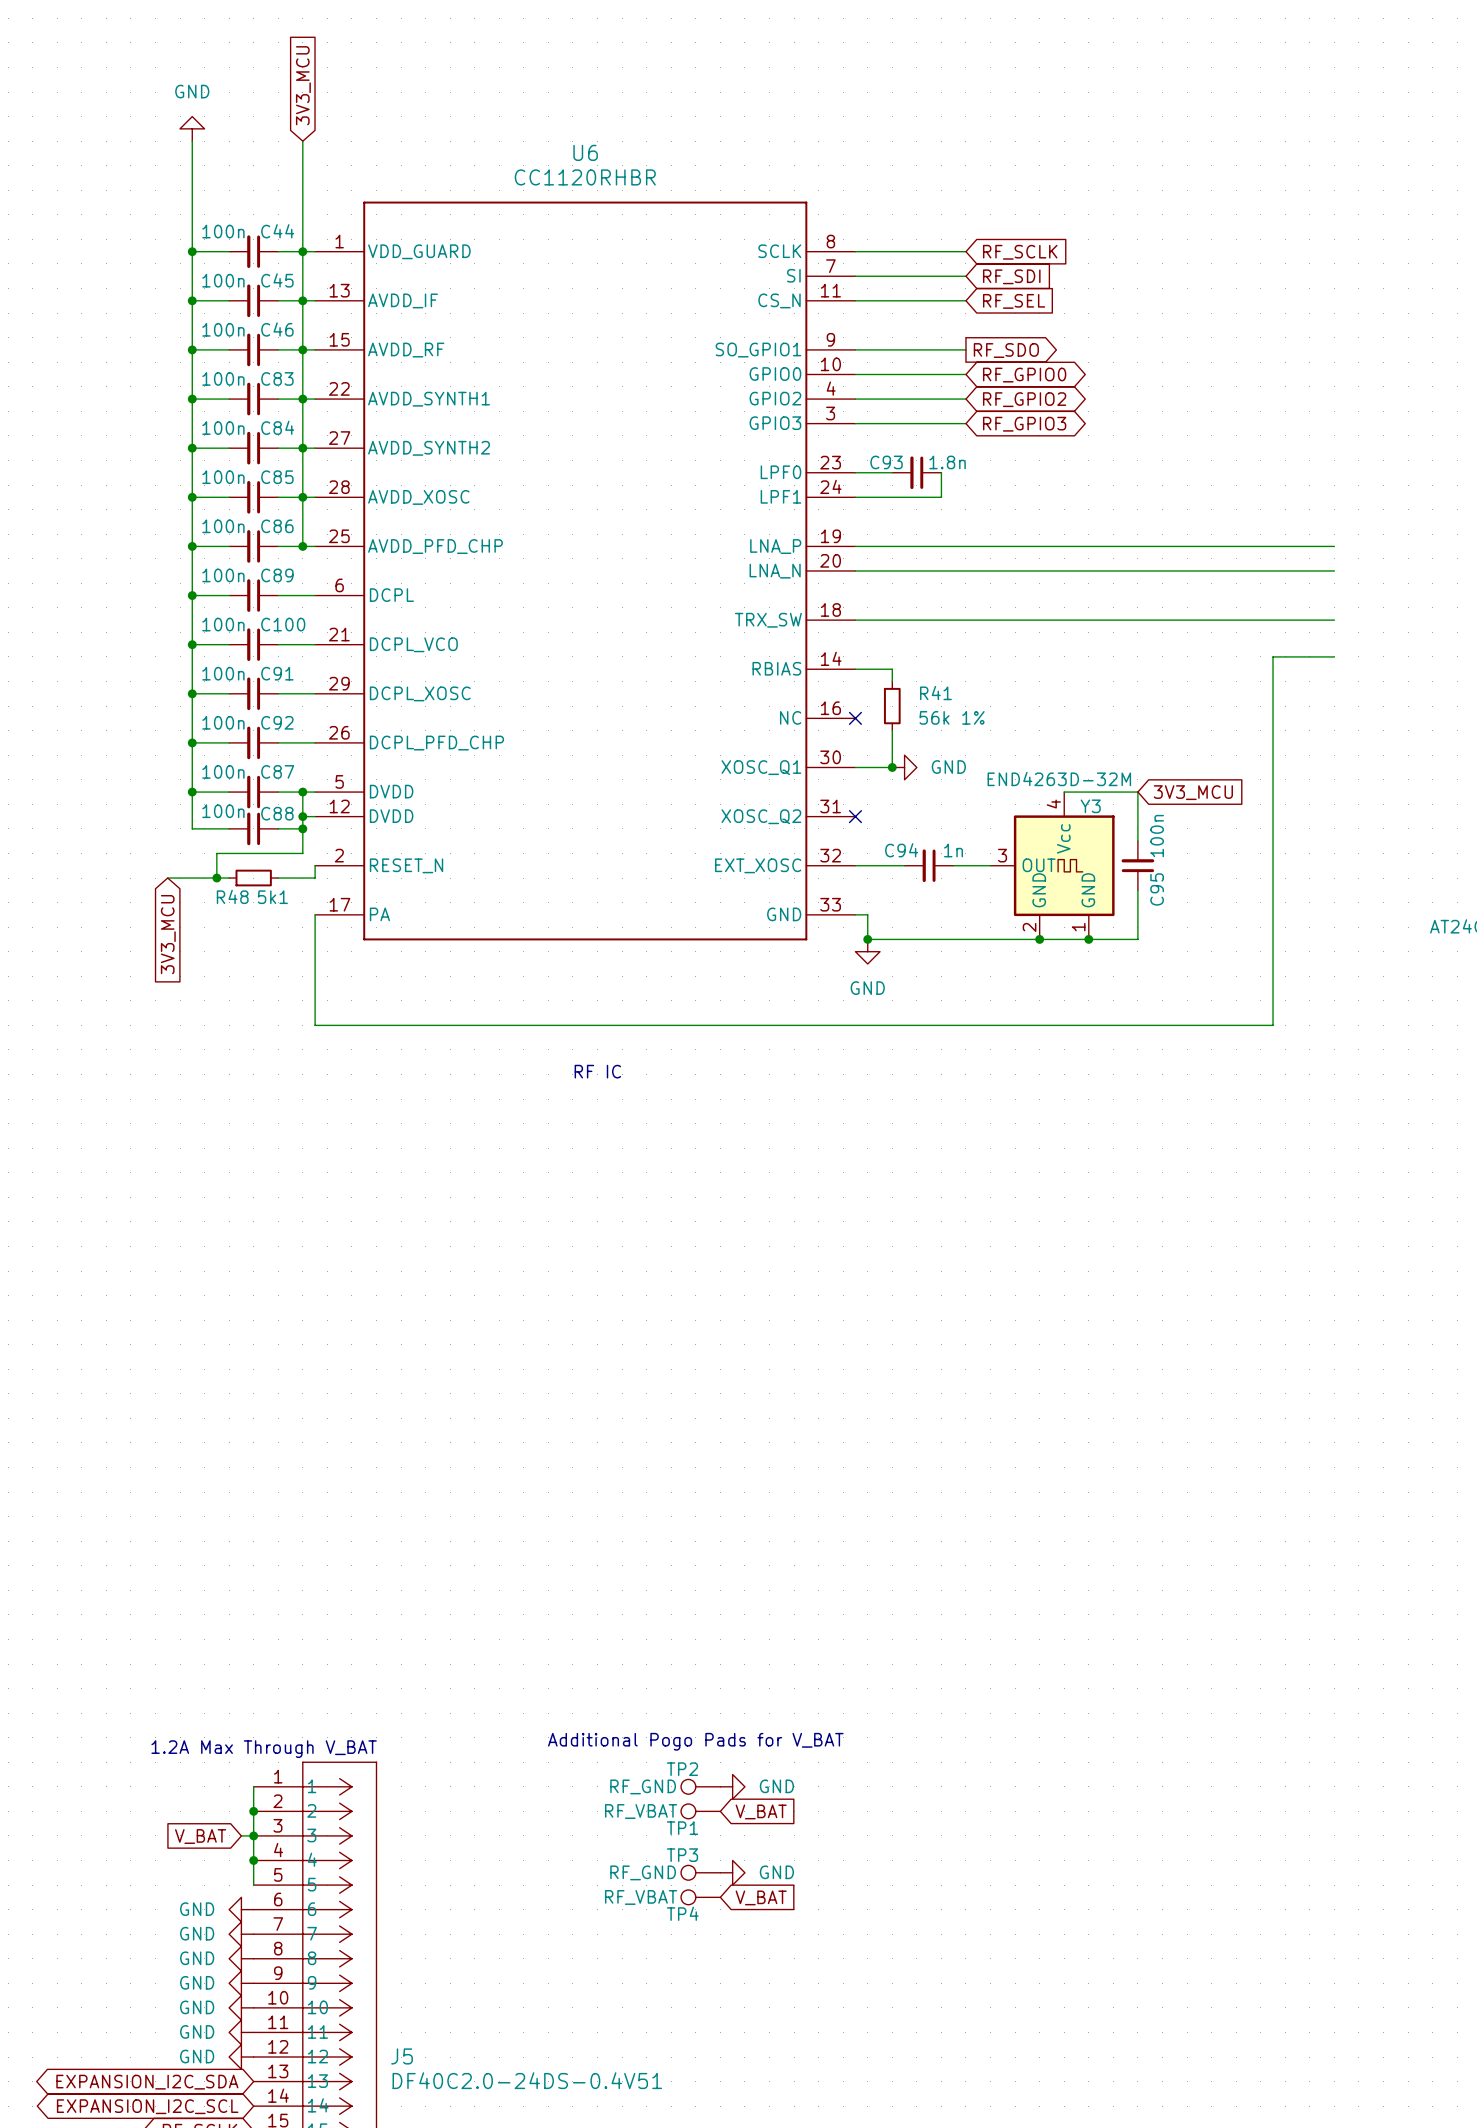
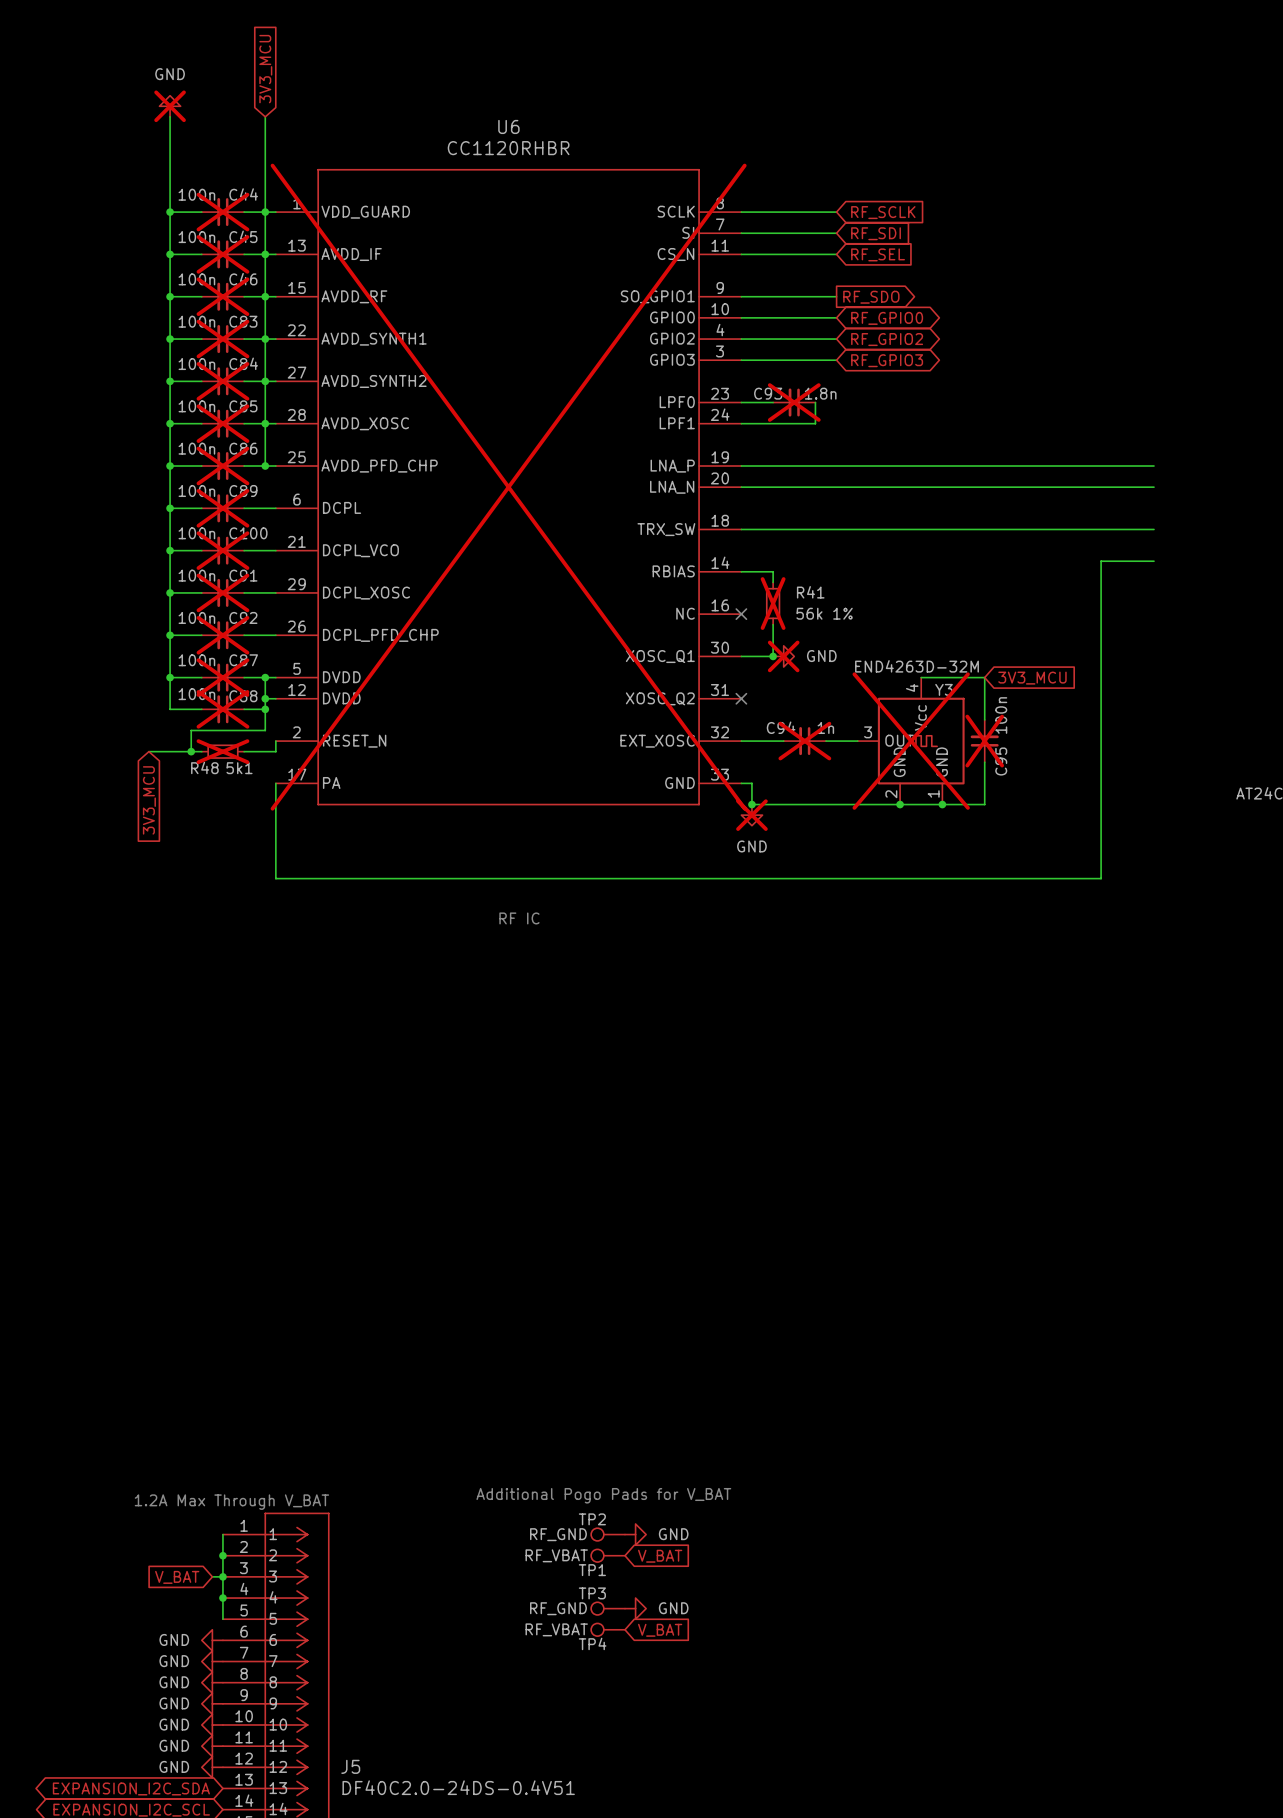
power symbol do-not-place cross: none -> (170, 106)
C44 do-not-place cross: none -> (222, 212)
C45 do-not-place cross: none -> (222, 254)
C46 do-not-place cross: none -> (222, 296)
C83 do-not-place cross: none -> (222, 339)
C84 do-not-place cross: none -> (222, 381)
C93 do-not-place cross: none -> (794, 402)
C85 do-not-place cross: none -> (222, 423)
C86 do-not-place cross: none -> (222, 466)
U6 do-not-place cross: none -> (508, 487)
C89 do-not-place cross: none -> (222, 508)
C100 do-not-place cross: none -> (222, 550)
C91 do-not-place cross: none -> (222, 592)
R41 do-not-place cross: none -> (773, 603)
C92 do-not-place cross: none -> (222, 635)
power symbol do-not-place cross: none -> (783, 656)
C87 do-not-place cross: none -> (222, 677)
C88 do-not-place cross: none -> (222, 709)
C94 do-not-place cross: none -> (804, 741)
Y3 do-not-place cross: none -> (911, 741)
C95 do-not-place cross: none -> (984, 741)
R48 do-not-place cross: none -> (222, 751)
power symbol do-not-place cross: none -> (751, 815)

